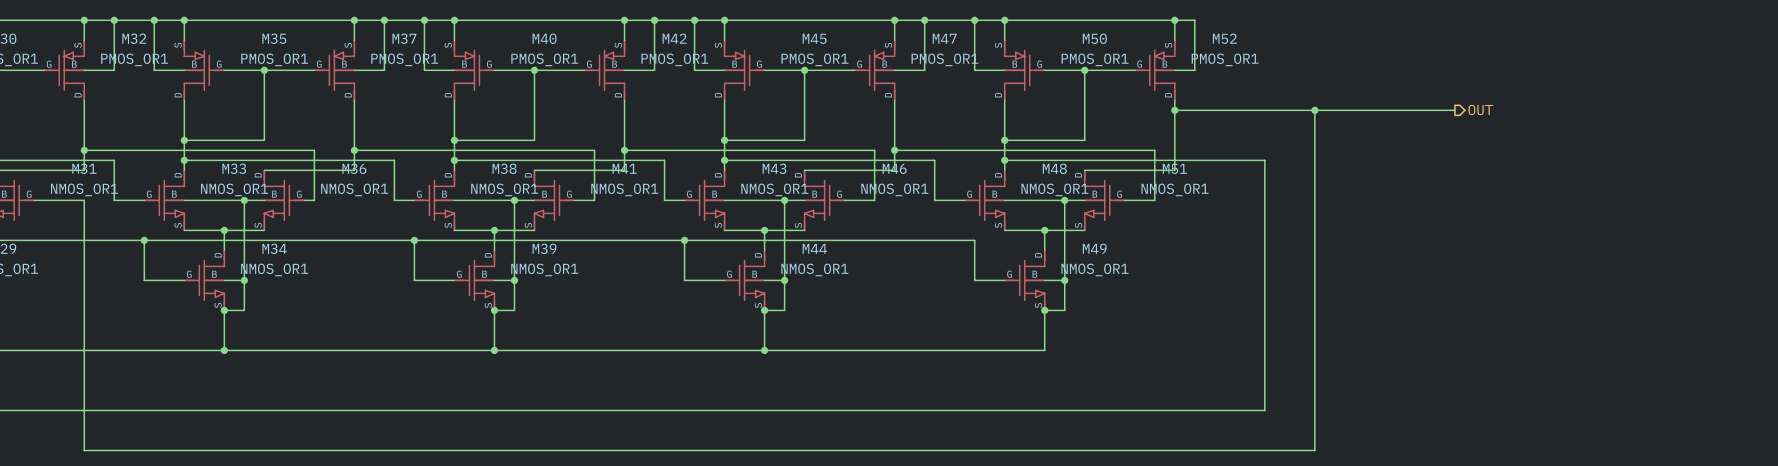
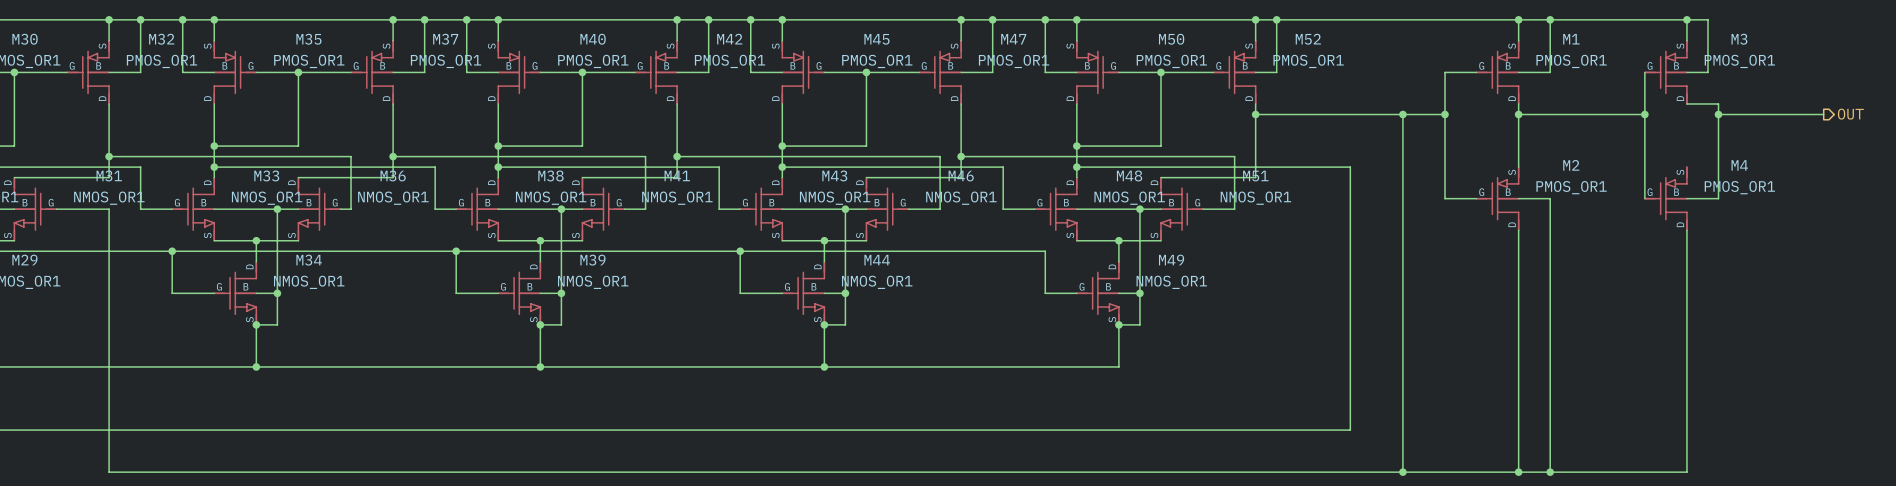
wire: none -> (1276, 19) (1707, 19) (1707, 72) (1686, 72)
junction: none -> (1276, 19)
wire: none -> (1518, 19) (1518, 40)
junction: none -> (1518, 19)
wire: none -> (1550, 19) (1550, 72) (1518, 72)
junction: none -> (1550, 19)
wire: none -> (1686, 19) (1686, 40)
junction: none -> (1686, 19)
wire: none -> (1476, 72) (1445, 72) (1445, 198) (1476, 198)
M1: none -> PMOS_OR1 (1497, 72)
wire: none -> (1644, 72) (1644, 198)
M3: none -> PMOS_OR1 (1665, 72)
wire: none -> (1518, 103) (1518, 167)
wire: none -> (1686, 103) (1718, 103) (1718, 198) (1686, 198)
hierarchical label: OUT (1480, 109) -> none
hierarchical label: none -> OUT (1850, 114)
wire: (1354, 110) (1424, 110) -> none
junction: none -> (1445, 114)
junction: none -> (1518, 114)
wire: none -> (1550, 114) (1644, 114)
junction: none -> (1644, 114)
wire: none -> (1718, 114) (1823, 114)
junction: none -> (1718, 114)
M2: none -> PMOS_OR1 (1497, 198)
wire: none -> (1518, 198) (1550, 198) (1550, 472)
M4: none -> PMOS_OR1 (1665, 198)
wire: none -> (1518, 230) (1518, 472)
wire: none -> (1686, 230) (1686, 472) (1402, 472)
junction: none -> (1402, 472)
junction: none -> (1518, 472)
junction: none -> (1550, 472)

